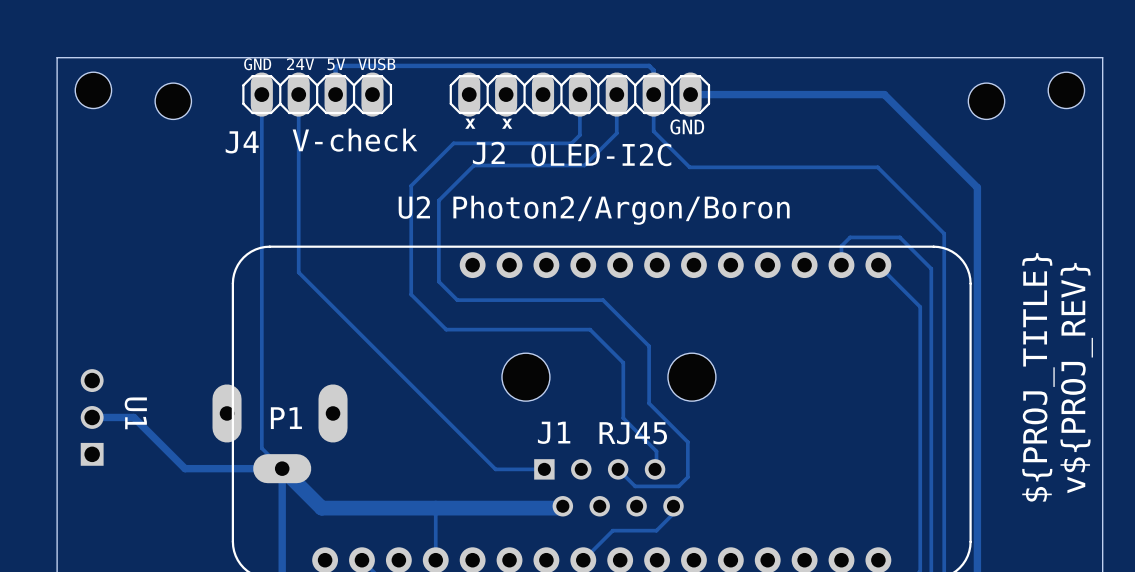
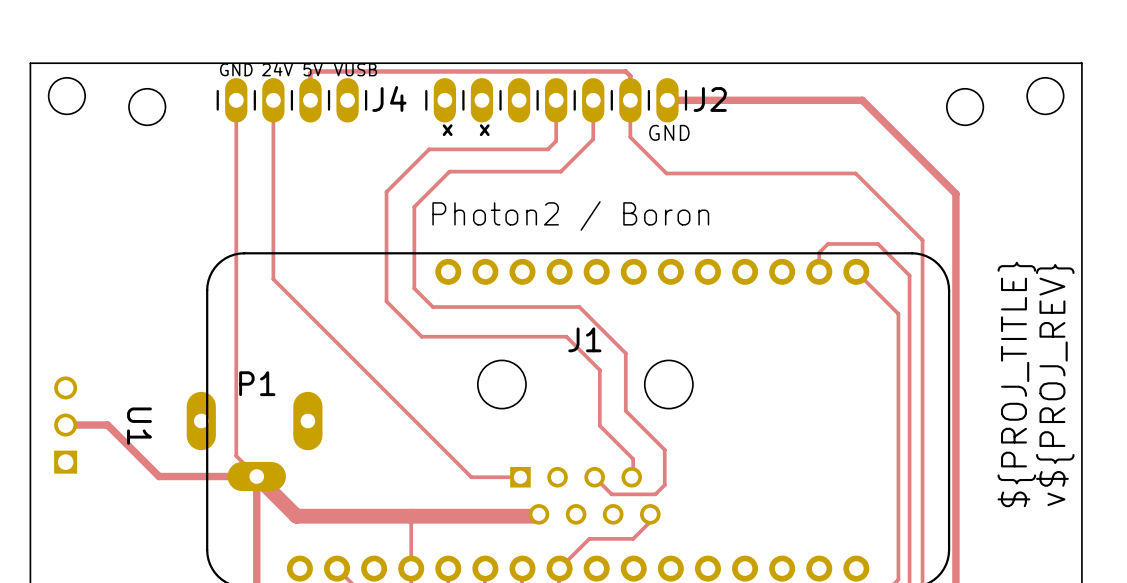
J4 footprint: [242, 72, 393, 117] -> [216, 78, 368, 123]
J2 footprint: [449, 72, 711, 117] -> [425, 78, 688, 123]
J4 text: V-check (355, 140) -> none
J4 name position: J4 (242, 142) -> J4 (389, 98)
J2 name position: J2 (488, 153) -> J2 (710, 99)
J2 text: OLED-I2C (601, 154) -> none
text: U2 Photon2/Argon/Boron (594, 210) -> Photon2 / Boron (570, 215)
U1 name position: U1 (135, 413) -> U1 (139, 426)
P1 name position: P1 (286, 418) -> P1 (257, 383)
J1 name position: J1 (554, 432) -> J1 (584, 339)
J1 text: RJ45 (633, 433) -> none

